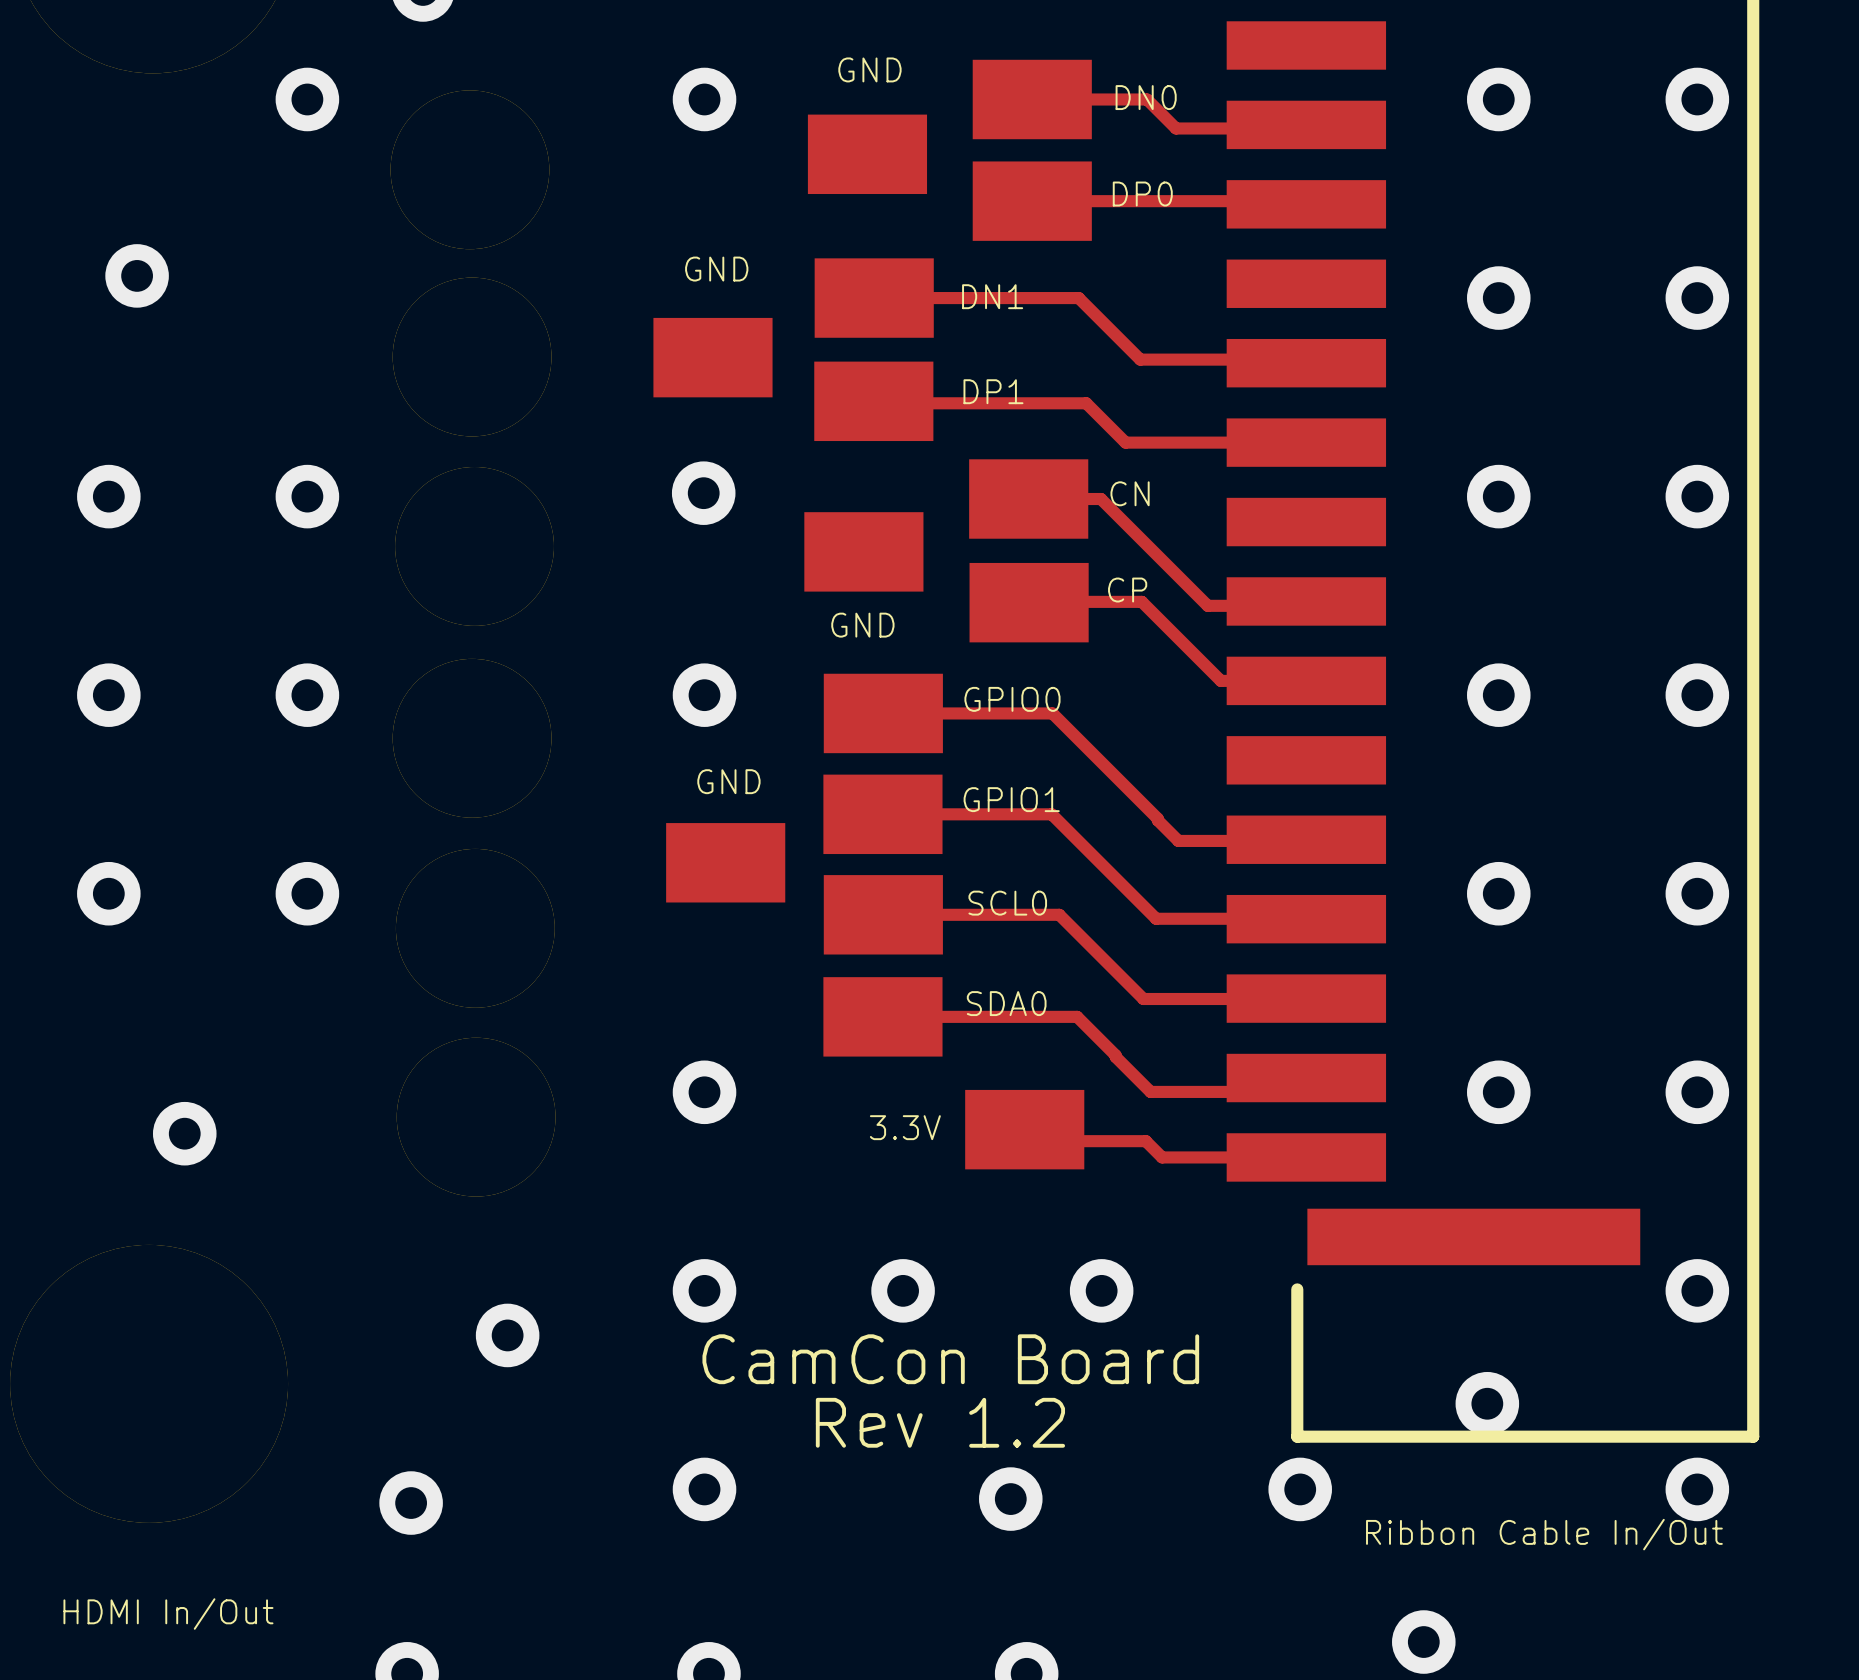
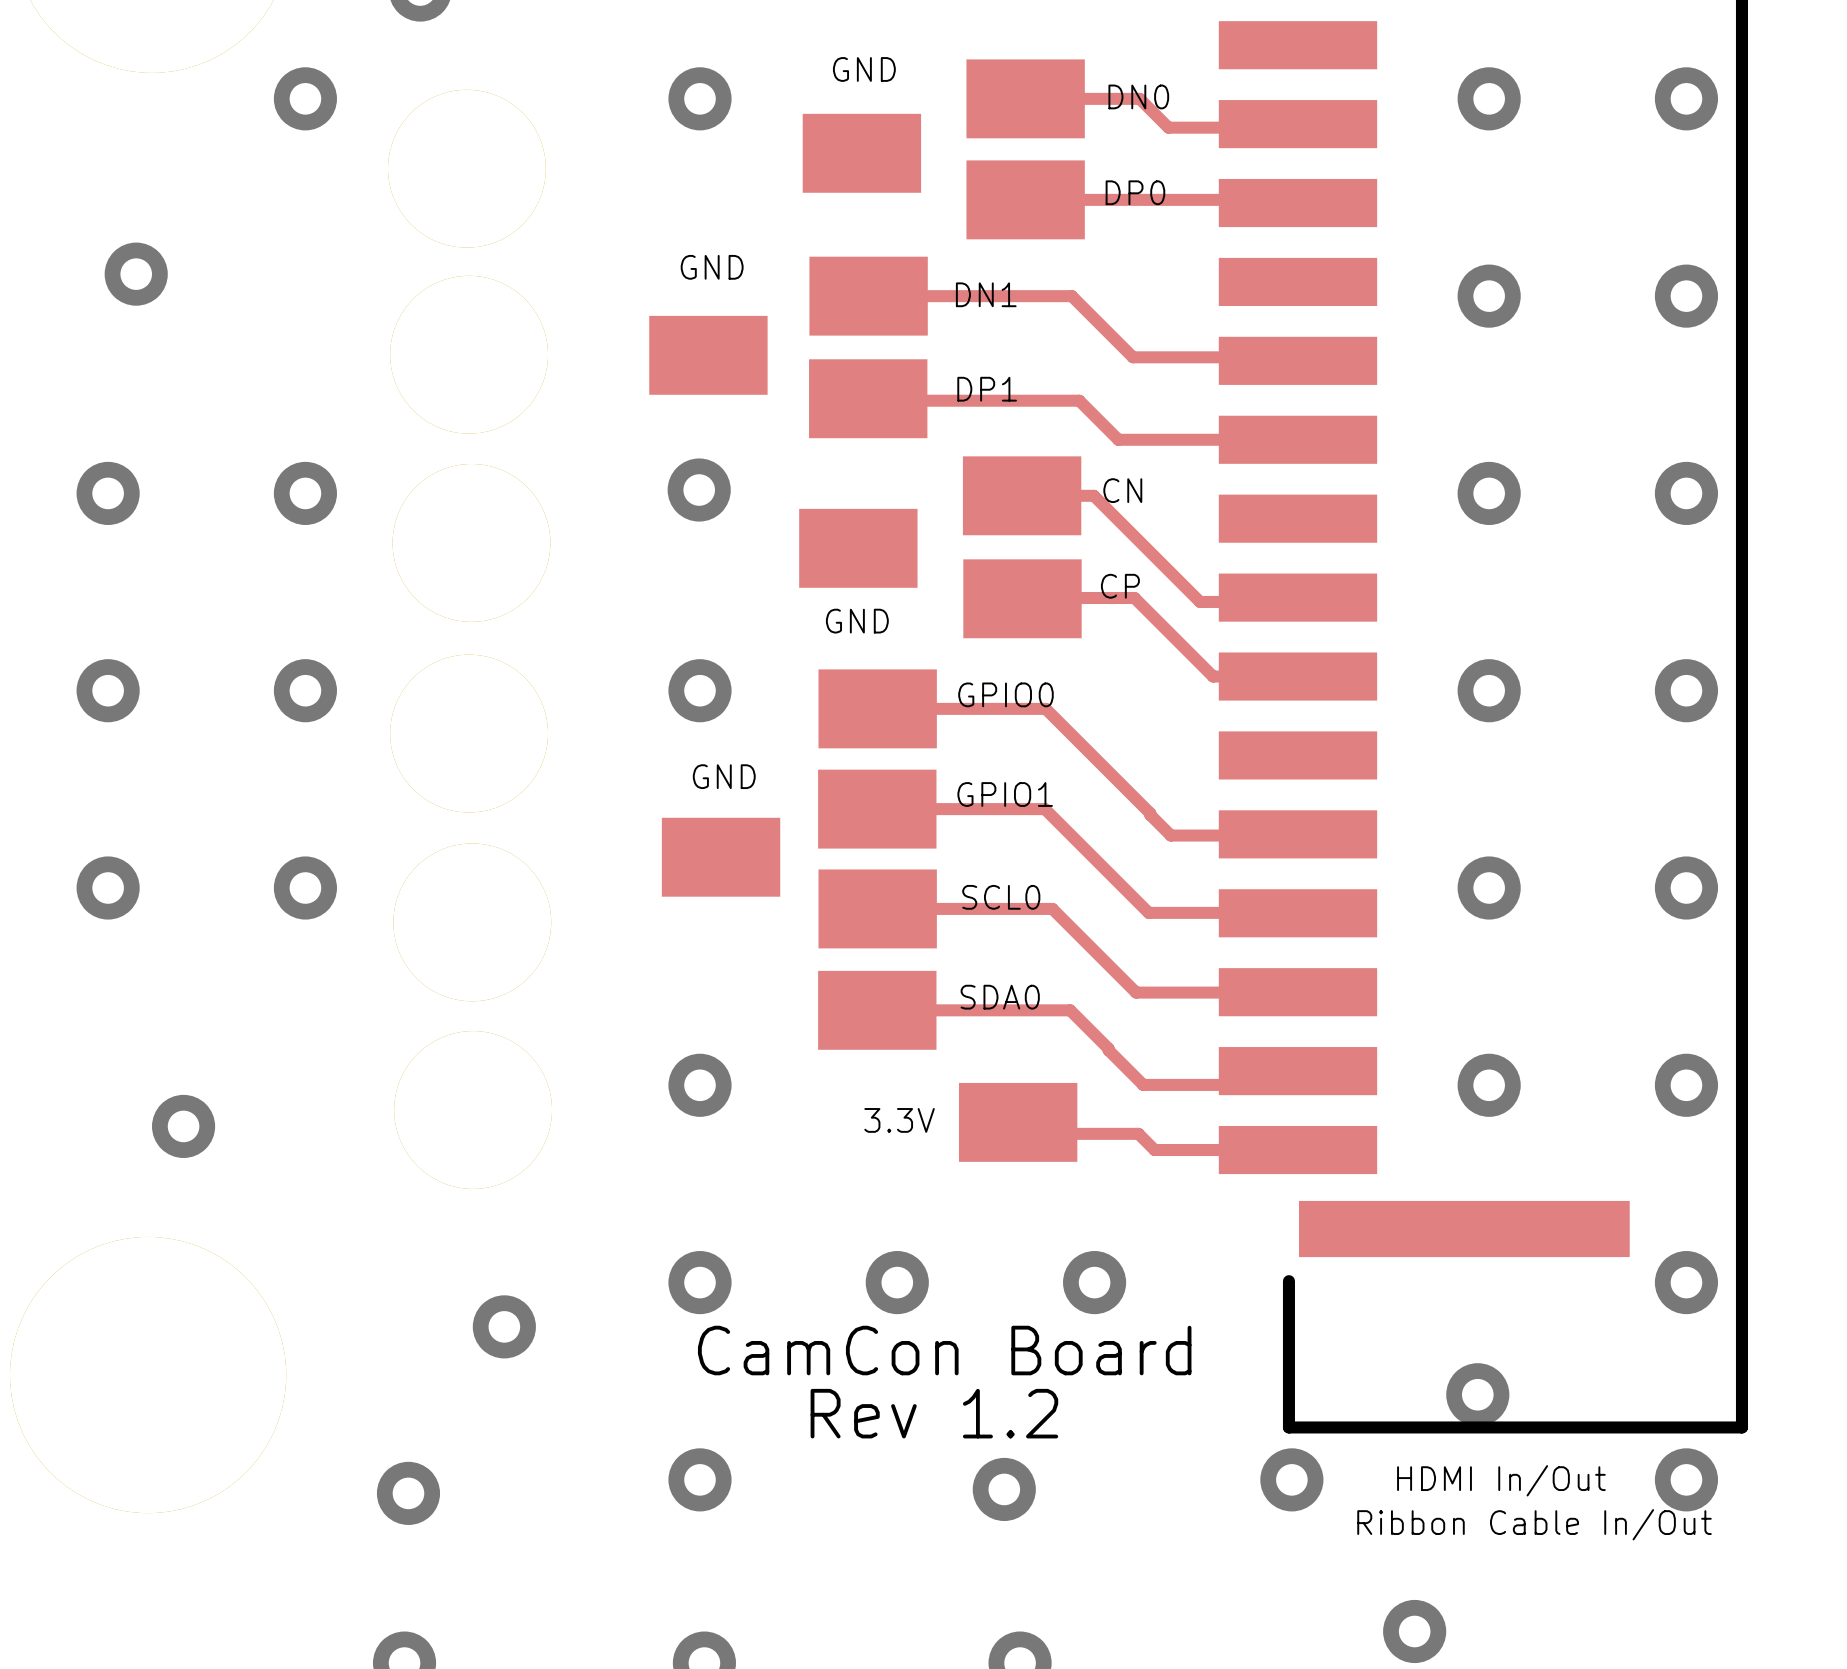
text position: HDMI In/Out (168, 1614) -> HDMI In/Out (1501, 1480)

